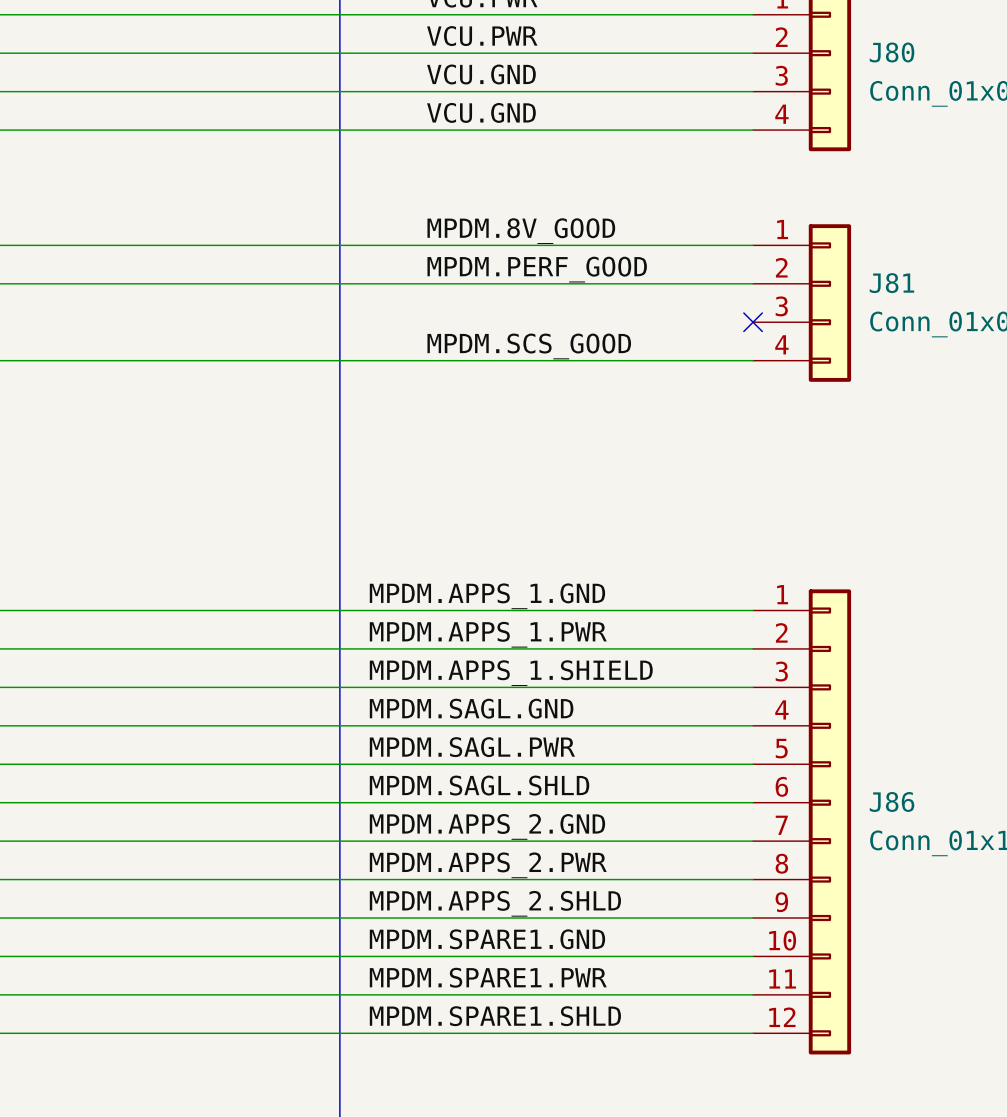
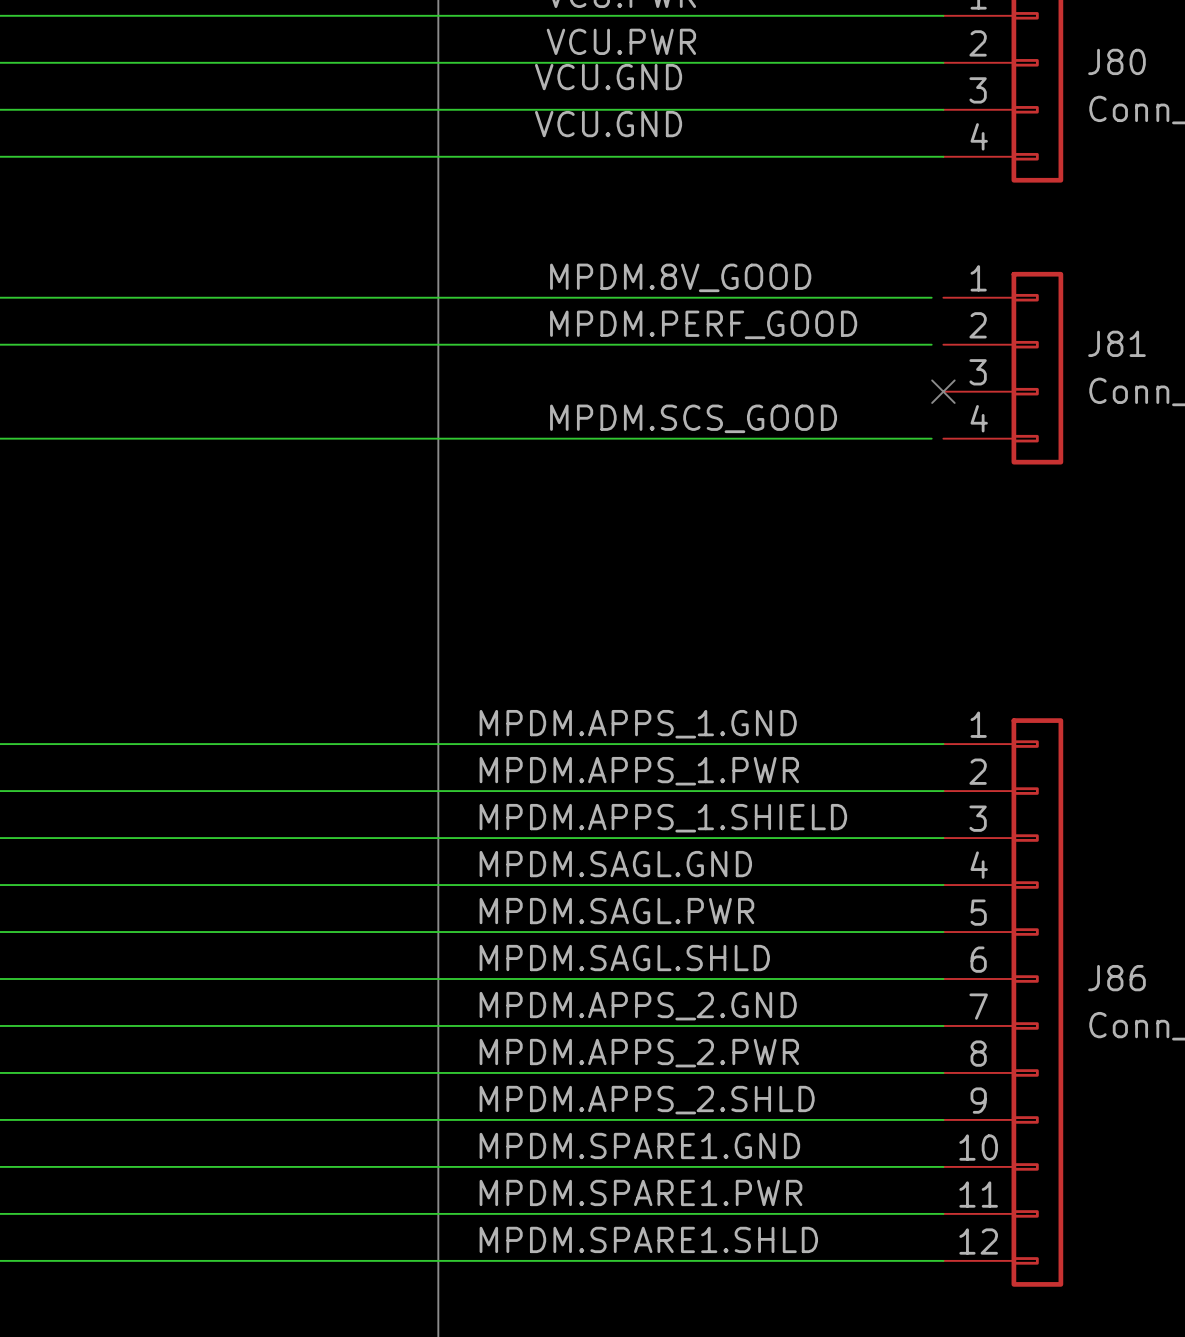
label position: VCU.GND (481, 74) -> VCU.GND (608, 77)
label position: VCU.GND (481, 112) -> VCU.GND (608, 124)
wire: (743, 245) (753, 245) -> none
wire: (743, 283) (753, 283) -> none
wire: (743, 360) (753, 360) -> none

